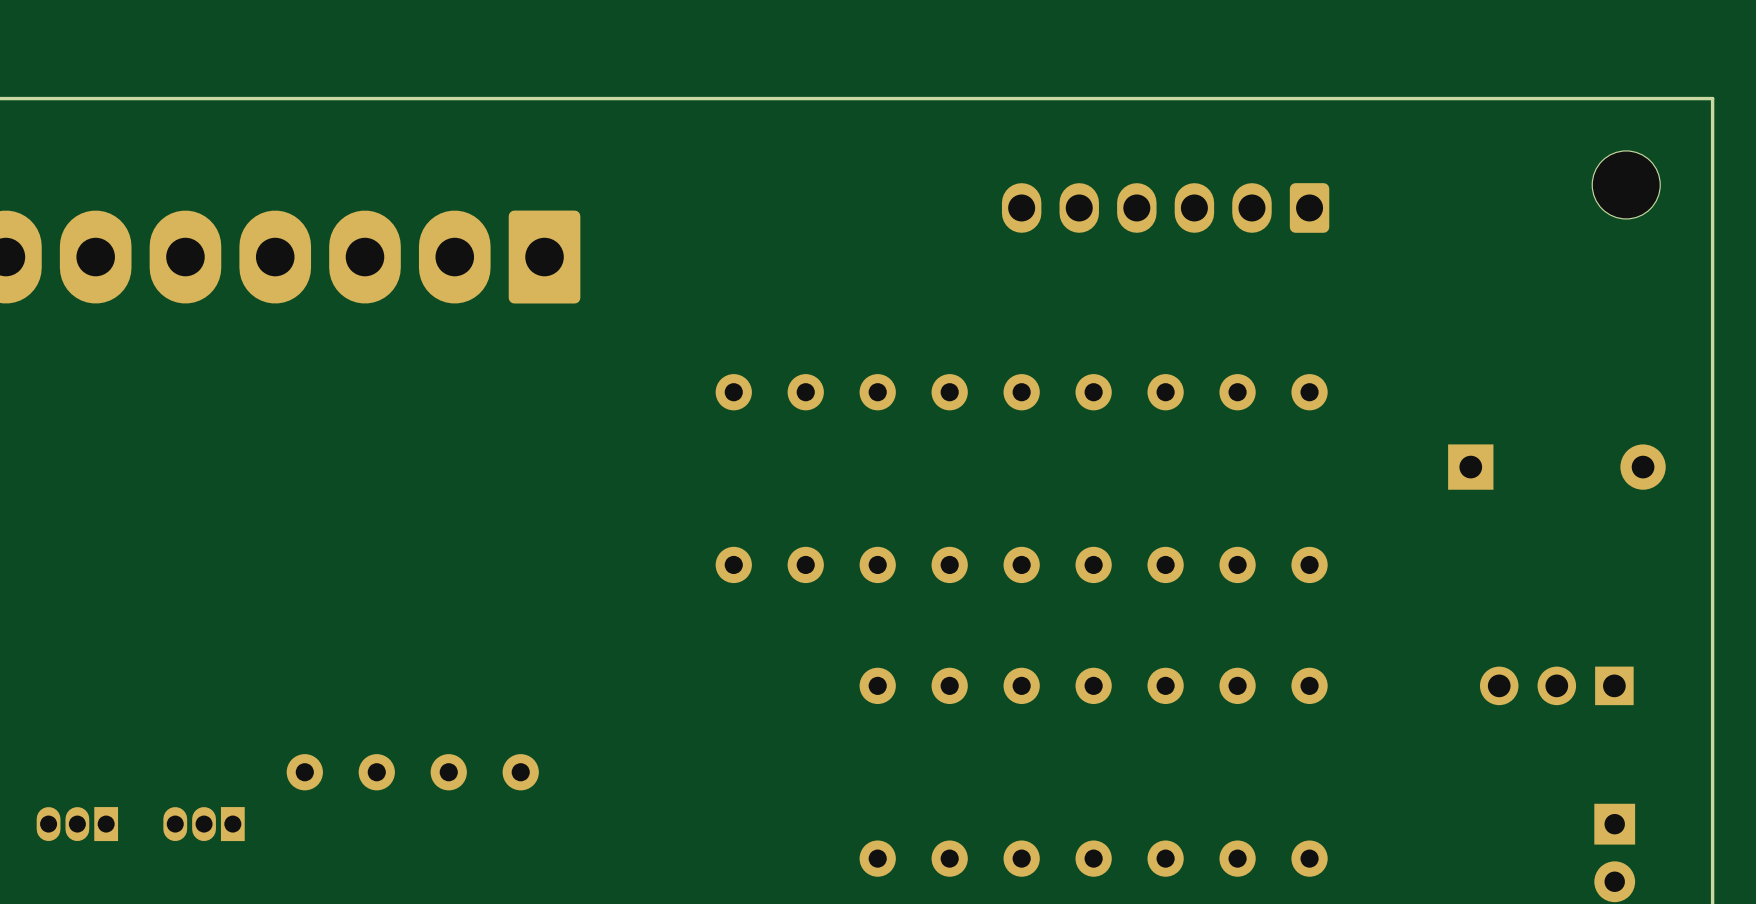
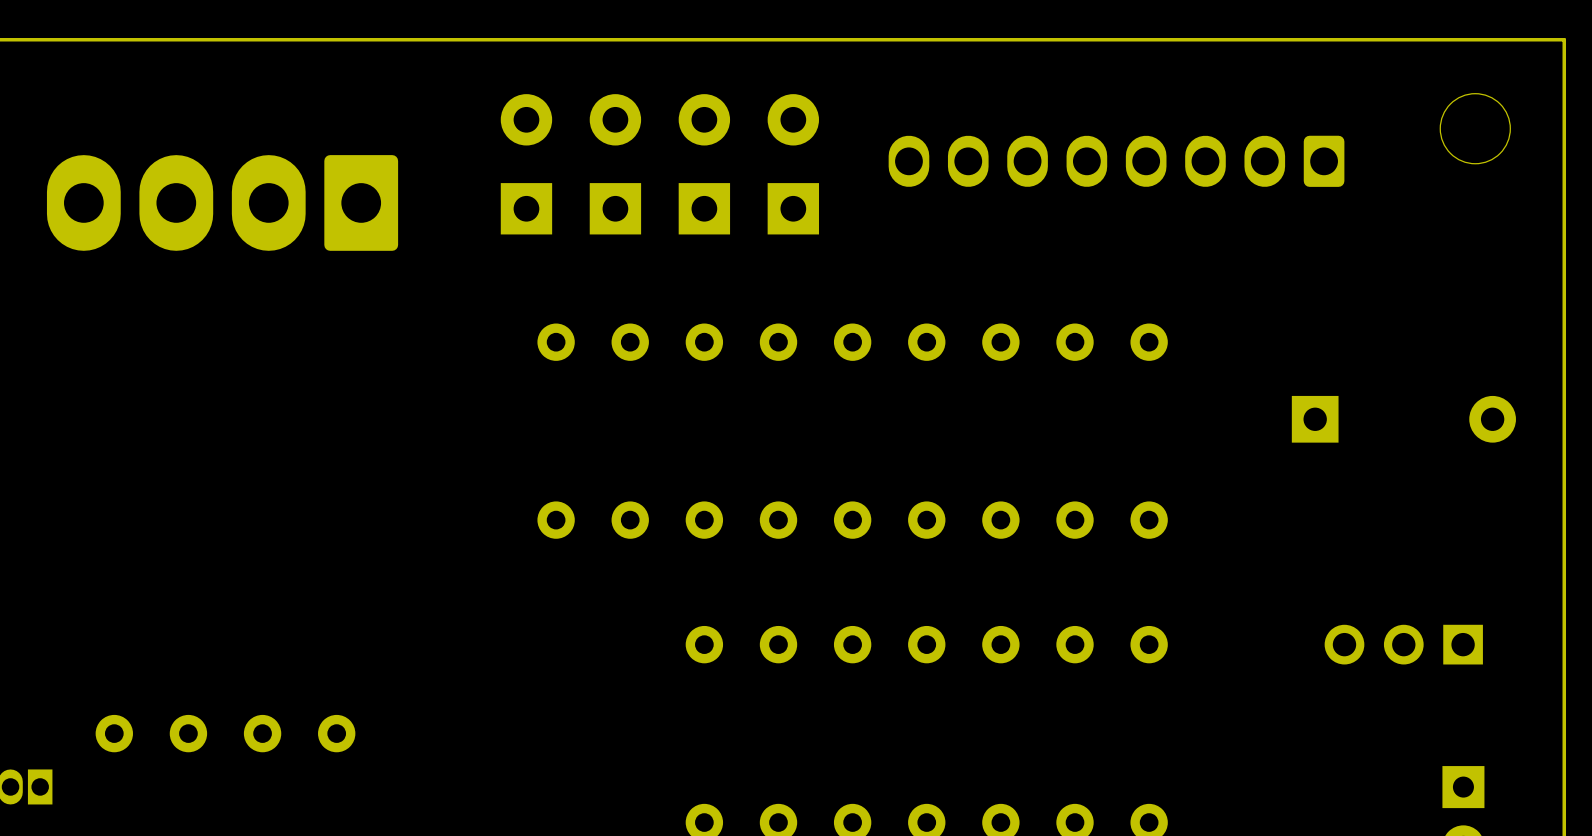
part: (1165, 207) -> none
part: none -> (1116, 161)
part: none -> (526, 164)
part: none -> (615, 164)
part: none -> (704, 164)
part: none -> (793, 164)

